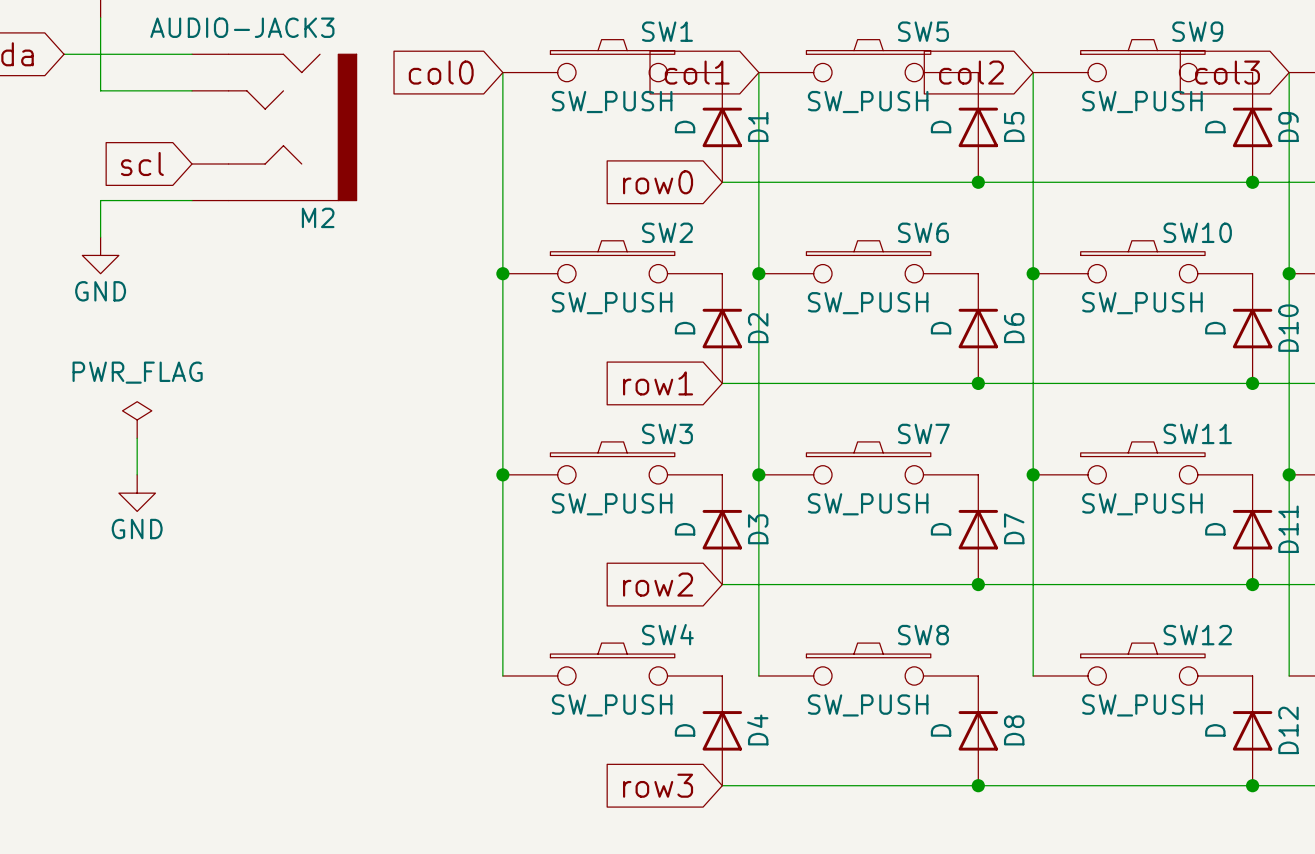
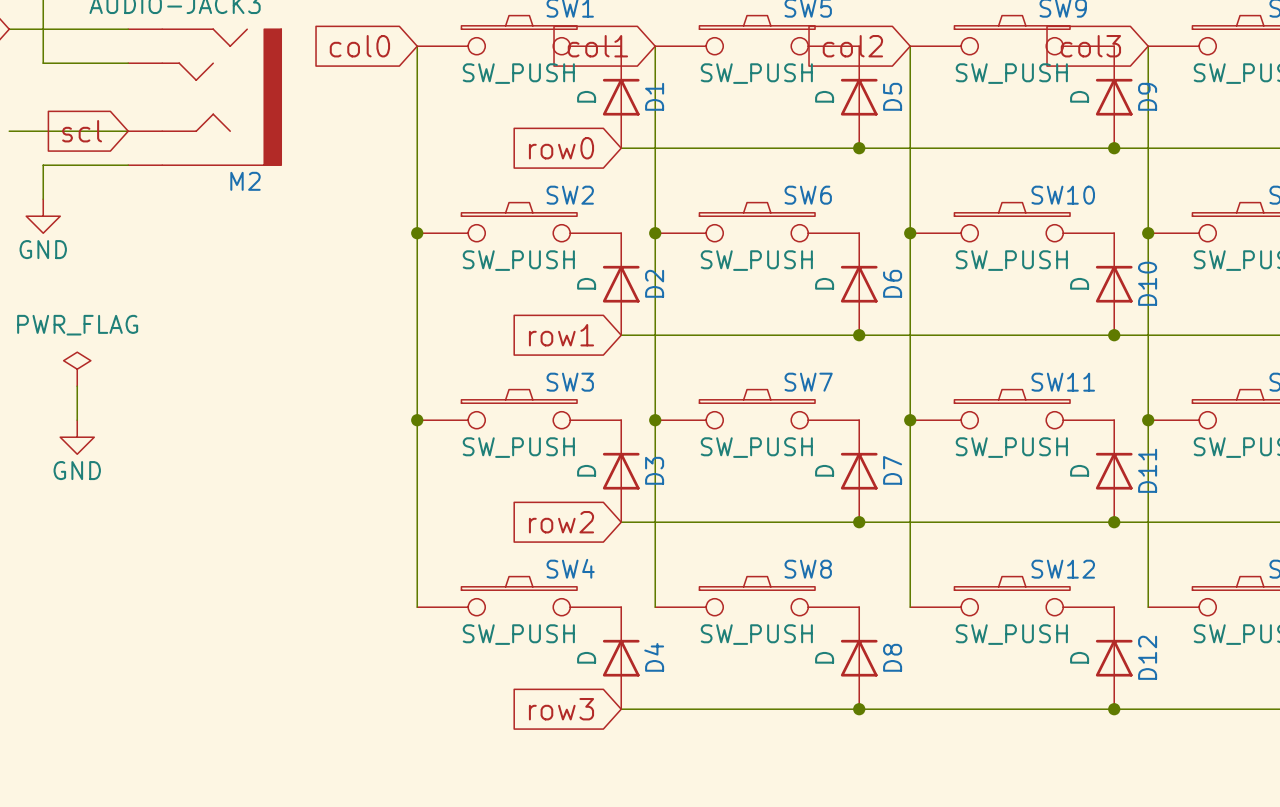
wire: none -> (9, 131) (128, 131)

